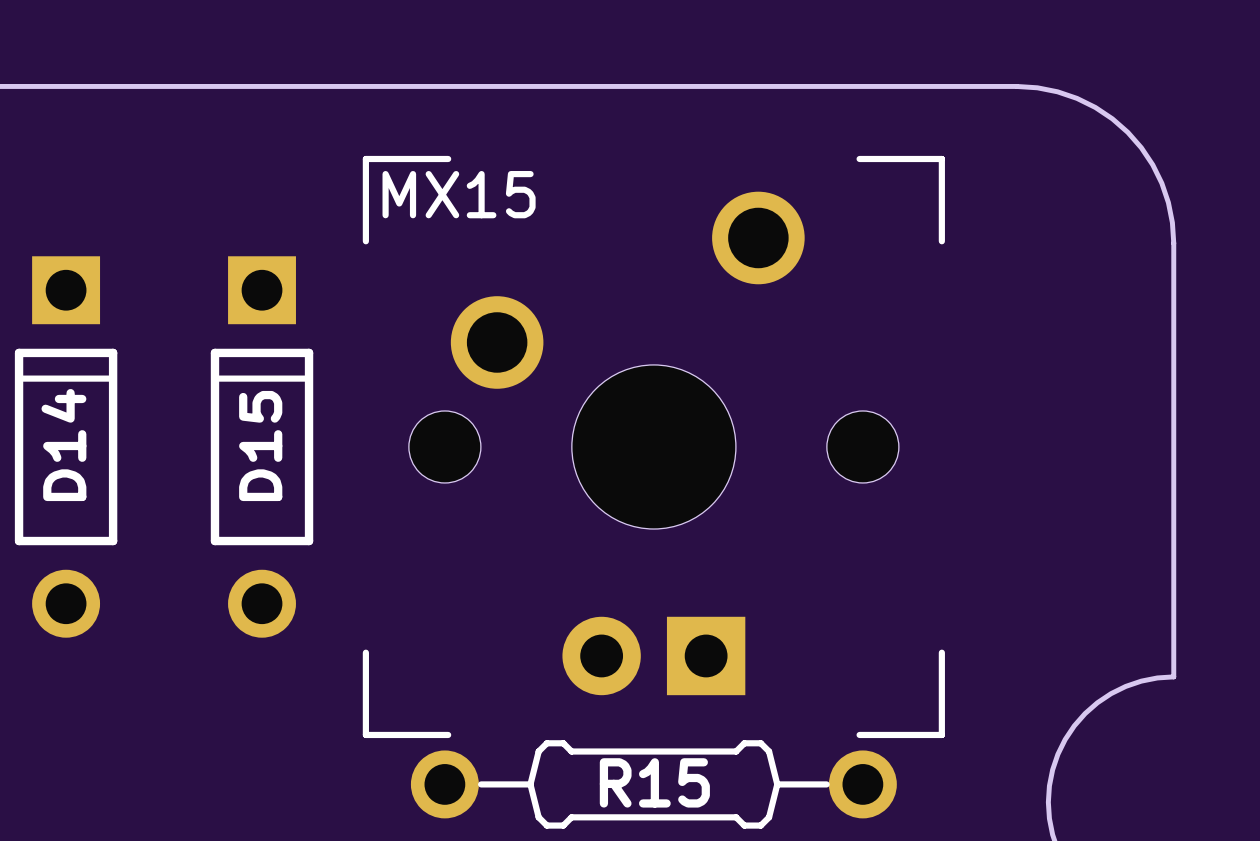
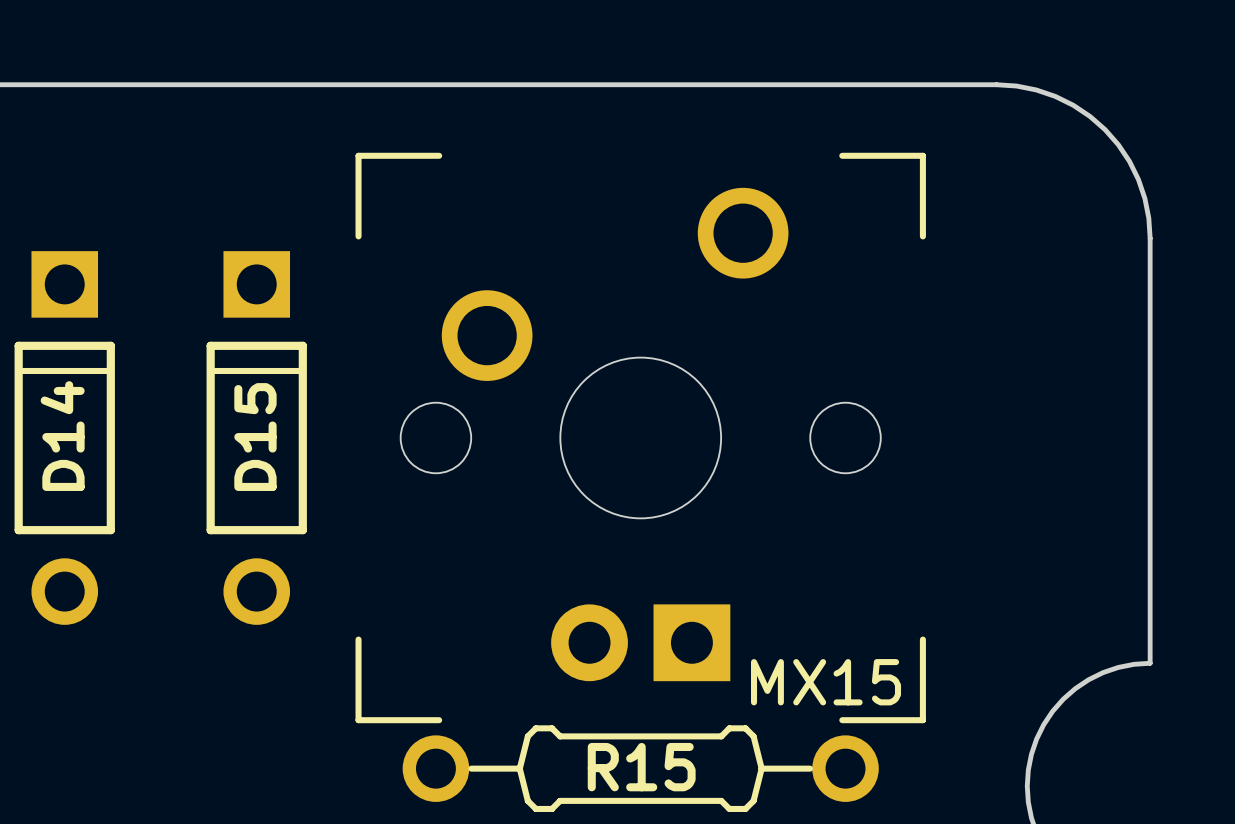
MX15 name position: MX15 (459, 194) -> MX15 (826, 682)

